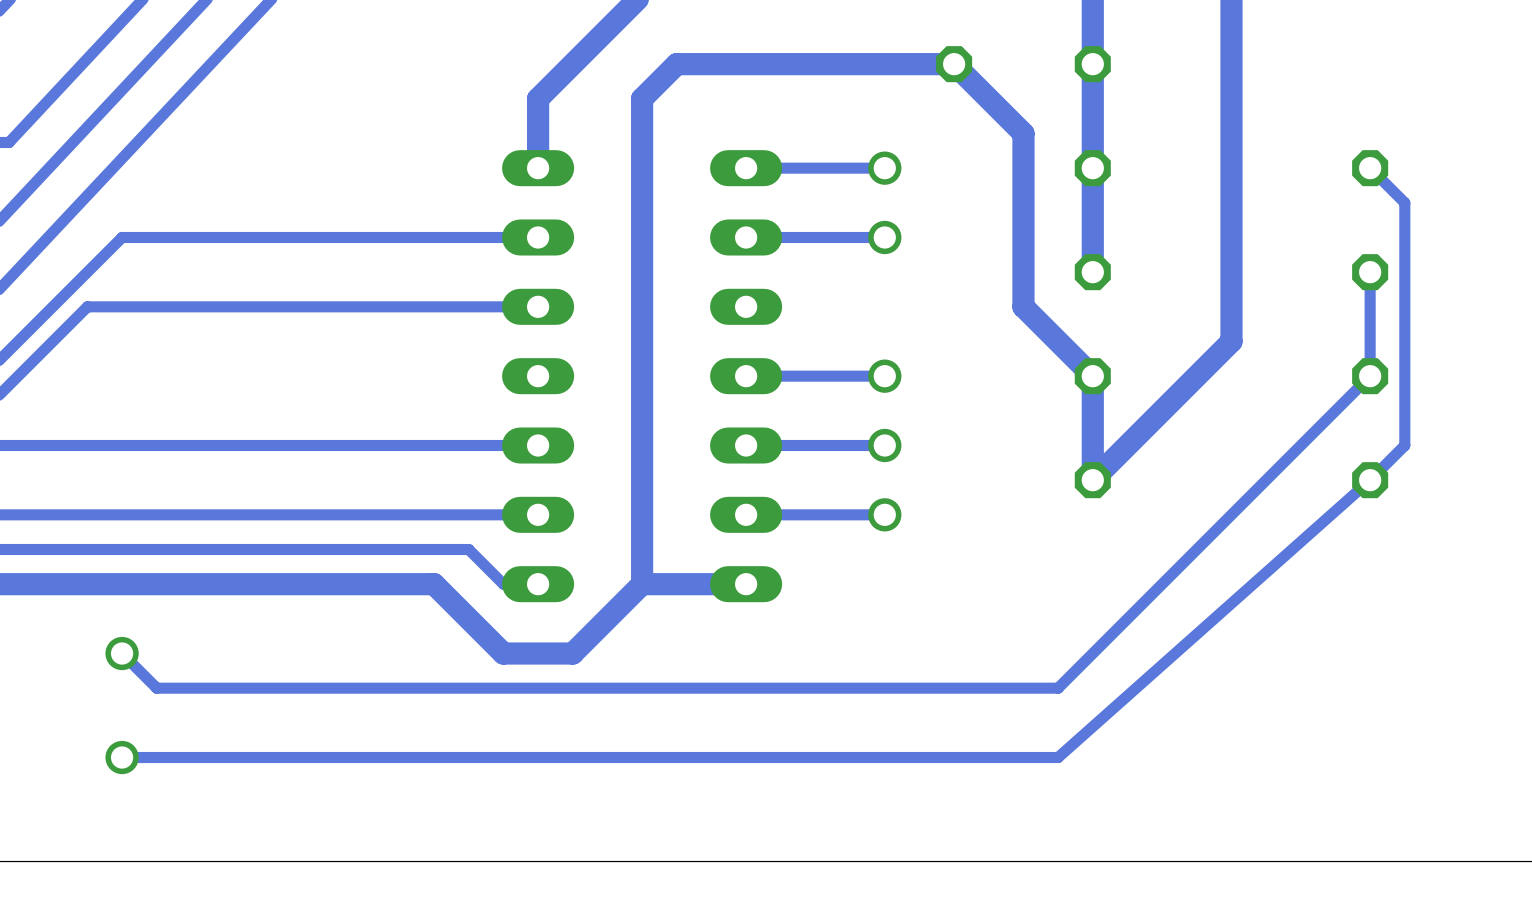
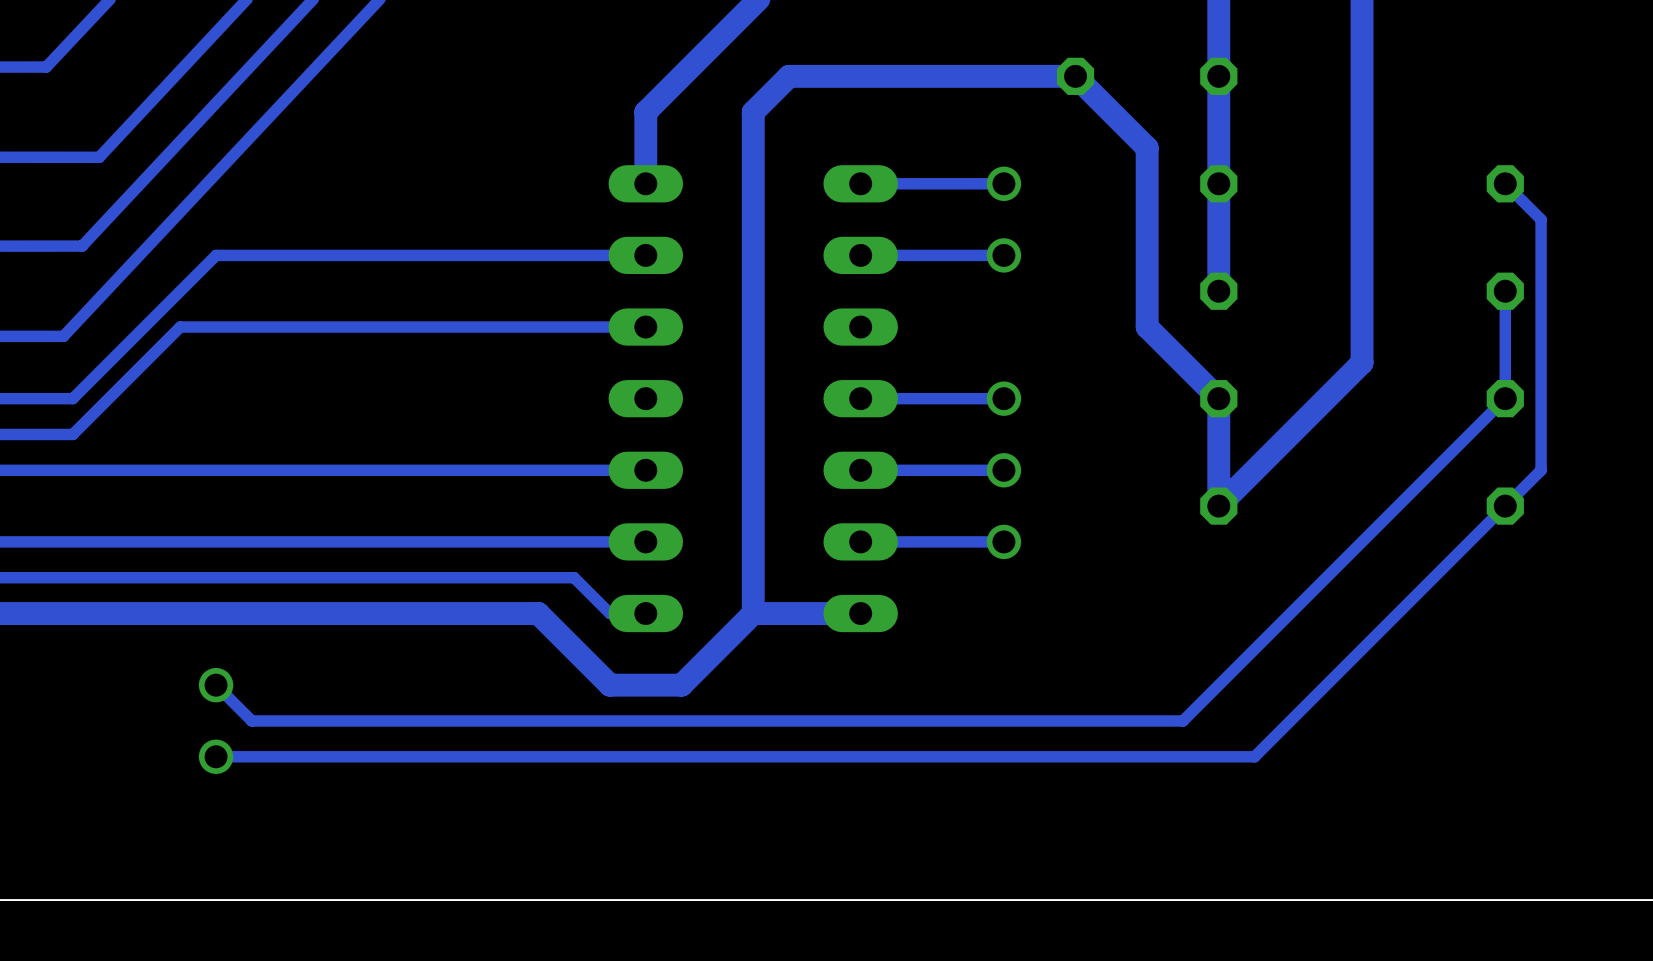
track: (1370, 480) (1058, 757) (122, 757) -> (1505, 506) (1254, 756) (216, 756)
via position: (122, 757) -> (216, 756)

